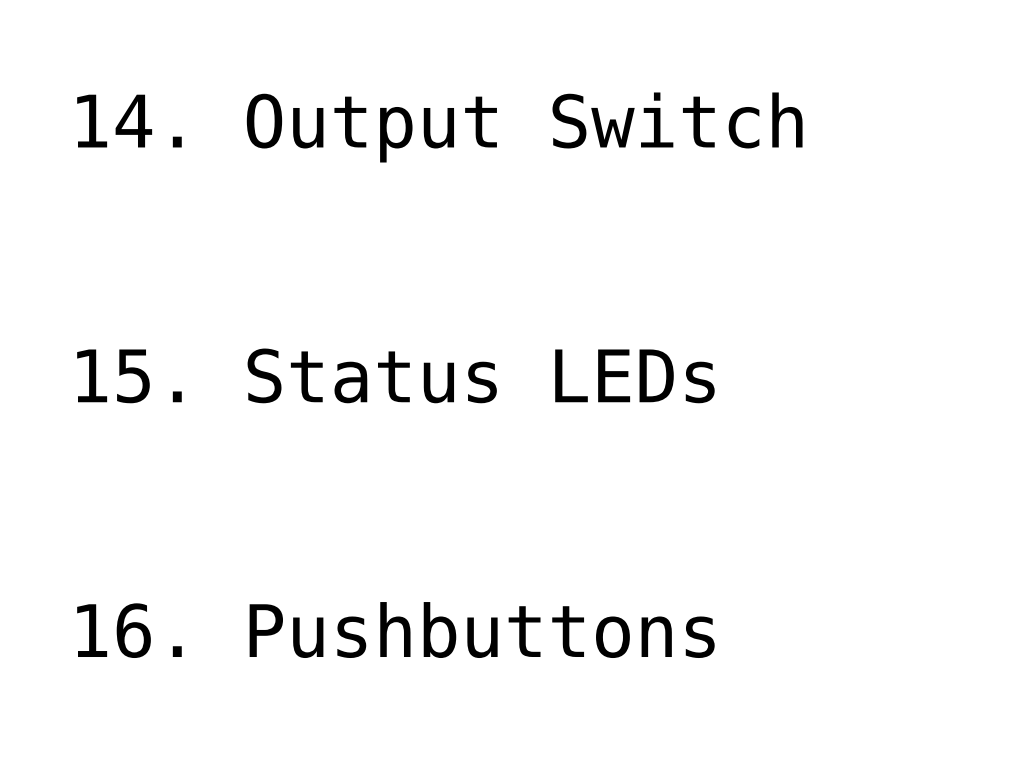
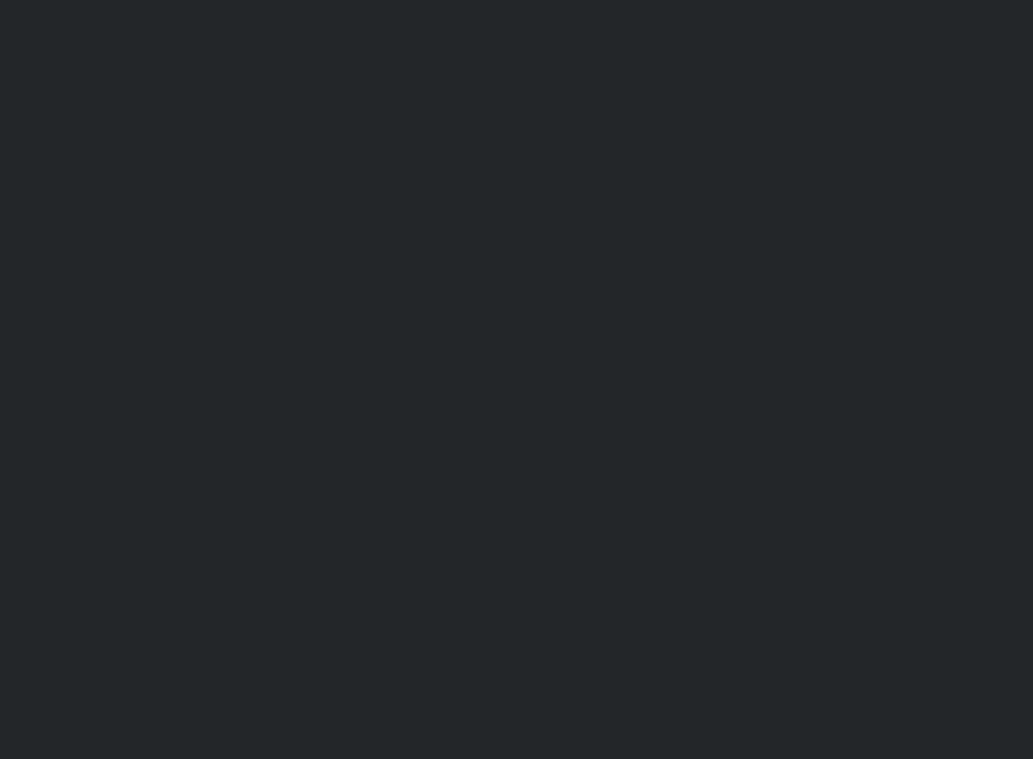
text: 14. Output Switch (439, 127) -> none
text: 15. Status LEDs (395, 375) -> none
text: 16. Pushbuttons (395, 630) -> none

